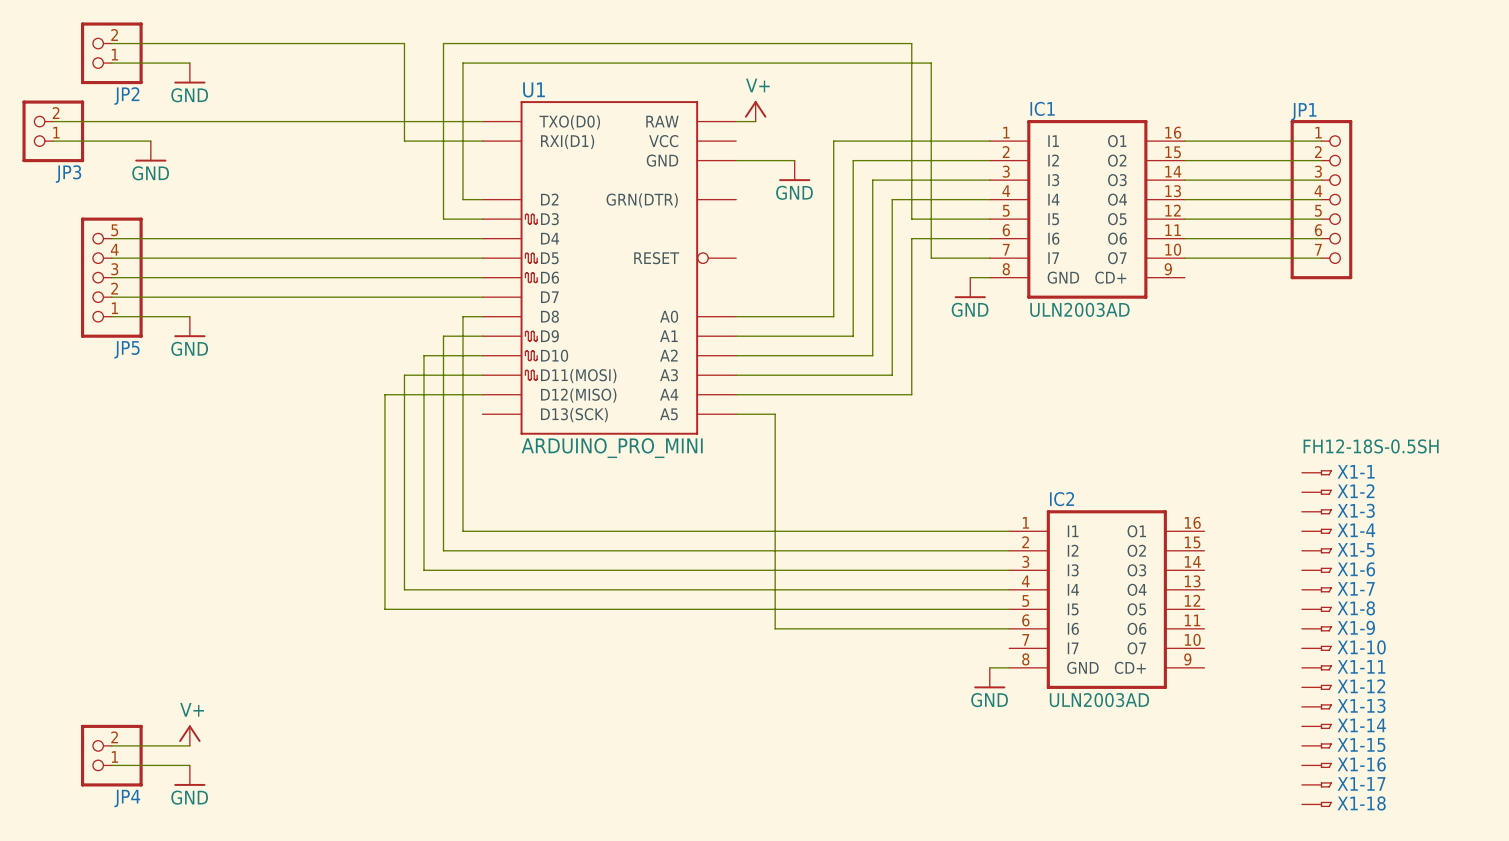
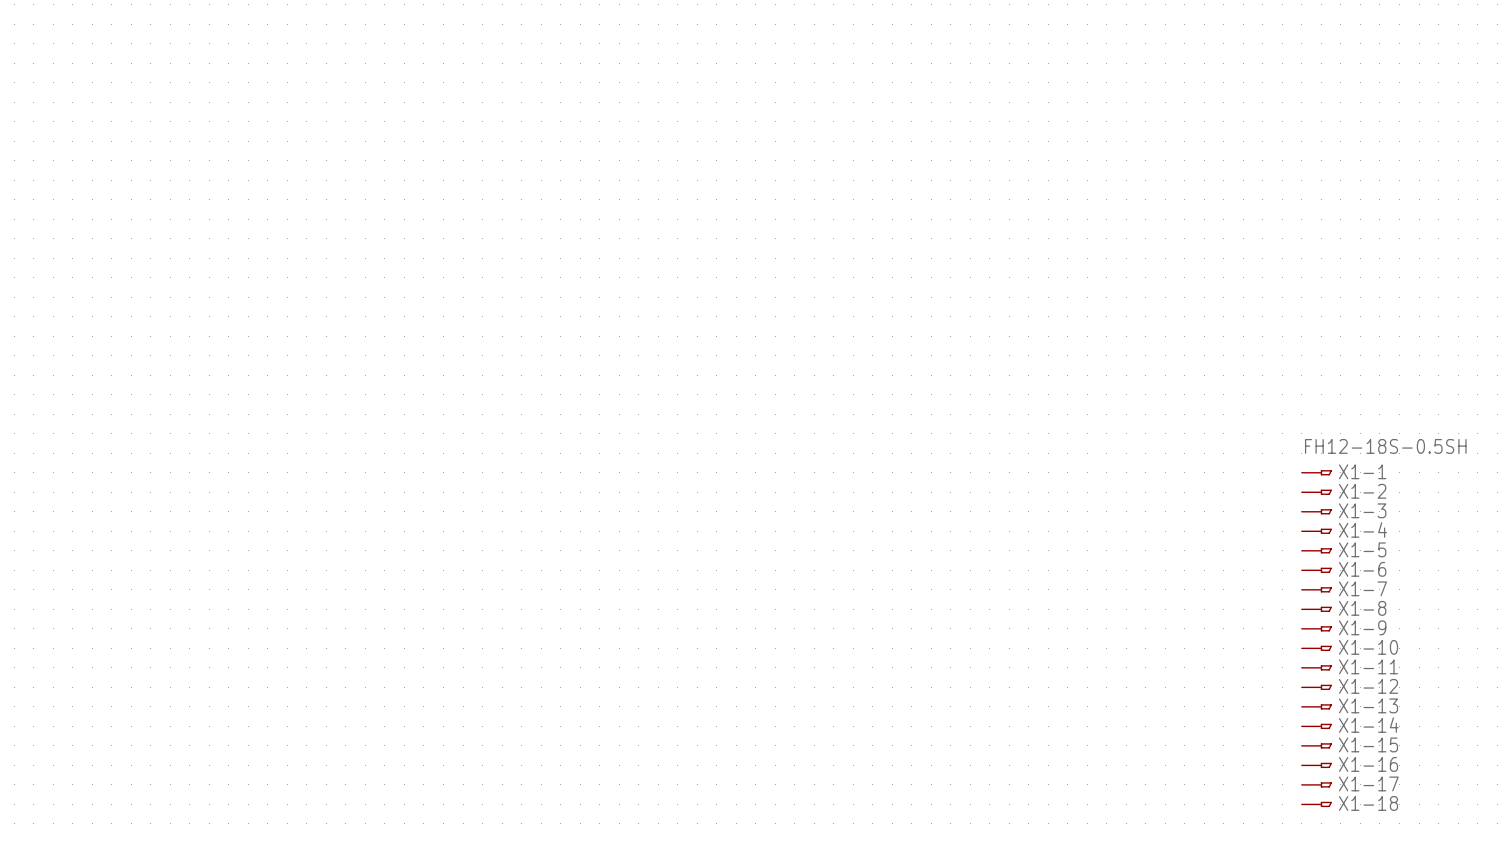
wire: (111, 43) (404, 43) (404, 141) (482, 141) -> none
JP2: (111, 53) -> none
wire: (111, 63) (189, 63) -> none
power symbol: GND (189, 73) -> none
power symbol: V+ (755, 111) -> none
wire: (53, 121) (482, 121) -> none
wire: (736, 121) (755, 121) -> none
JP3: (53, 131) -> none
wire: (53, 141) (150, 141) -> none
wire: (989, 141) (833, 141) (833, 316) (736, 316) -> none
wire: (1184, 141) (1321, 141) -> none
power symbol: GND (150, 151) -> none
wire: (736, 160) (794, 160) -> none
wire: (989, 160) (853, 160) (853, 336) (736, 336) -> none
wire: (1184, 160) (1321, 160) -> none
power symbol: GND (794, 170) -> none
wire: (989, 180) (872, 180) (872, 355) (736, 355) -> none
wire: (1184, 180) (1321, 180) -> none
wire: (482, 199) (463, 199) (463, 63) (931, 63) (931, 258) (989, 258) -> none
wire: (989, 199) (892, 199) (892, 375) (736, 375) -> none
wire: (1184, 199) (1321, 199) -> none
JP1: (1321, 199) -> none
IC1: ULN2003AD (1087, 209) -> none
wire: (482, 219) (443, 219) (443, 43) (911, 43) (911, 219) (989, 219) -> none
wire: (1184, 219) (1321, 219) -> none
wire: (111, 238) (482, 238) -> none
wire: (989, 238) (911, 238) (911, 394) (736, 394) -> none
wire: (1184, 238) (1321, 238) -> none
wire: (111, 258) (482, 258) -> none
wire: (1184, 258) (1321, 258) -> none
U1: ARDUINO_PRO_MINI (609, 267) -> none
wire: (111, 277) (482, 277) -> none
JP5: (111, 277) -> none
wire: (970, 277) (989, 277) -> none
power symbol: GND (970, 287) -> none
wire: (111, 297) (482, 297) -> none
wire: (111, 316) (189, 316) -> none
wire: (482, 316) (463, 316) (463, 531) (1009, 531) -> none
power symbol: GND (189, 326) -> none
wire: (482, 336) (443, 336) (443, 550) (1009, 550) -> none
wire: (482, 355) (423, 355) (423, 570) (1009, 570) -> none
wire: (482, 375) (404, 375) (404, 589) (1009, 589) -> none
wire: (482, 394) (384, 394) (384, 609) (1009, 609) -> none
wire: (736, 414) (775, 414) (775, 628) (1009, 628) -> none
IC2: ULN2003AD (1106, 599) -> none
wire: (989, 667) (1009, 667) -> none
power symbol: GND (989, 678) -> none
power symbol: V+ (189, 735) -> none
wire: (111, 745) (189, 745) -> none
JP4: (111, 755) -> none
wire: (111, 765) (189, 765) -> none
power symbol: GND (189, 775) -> none

